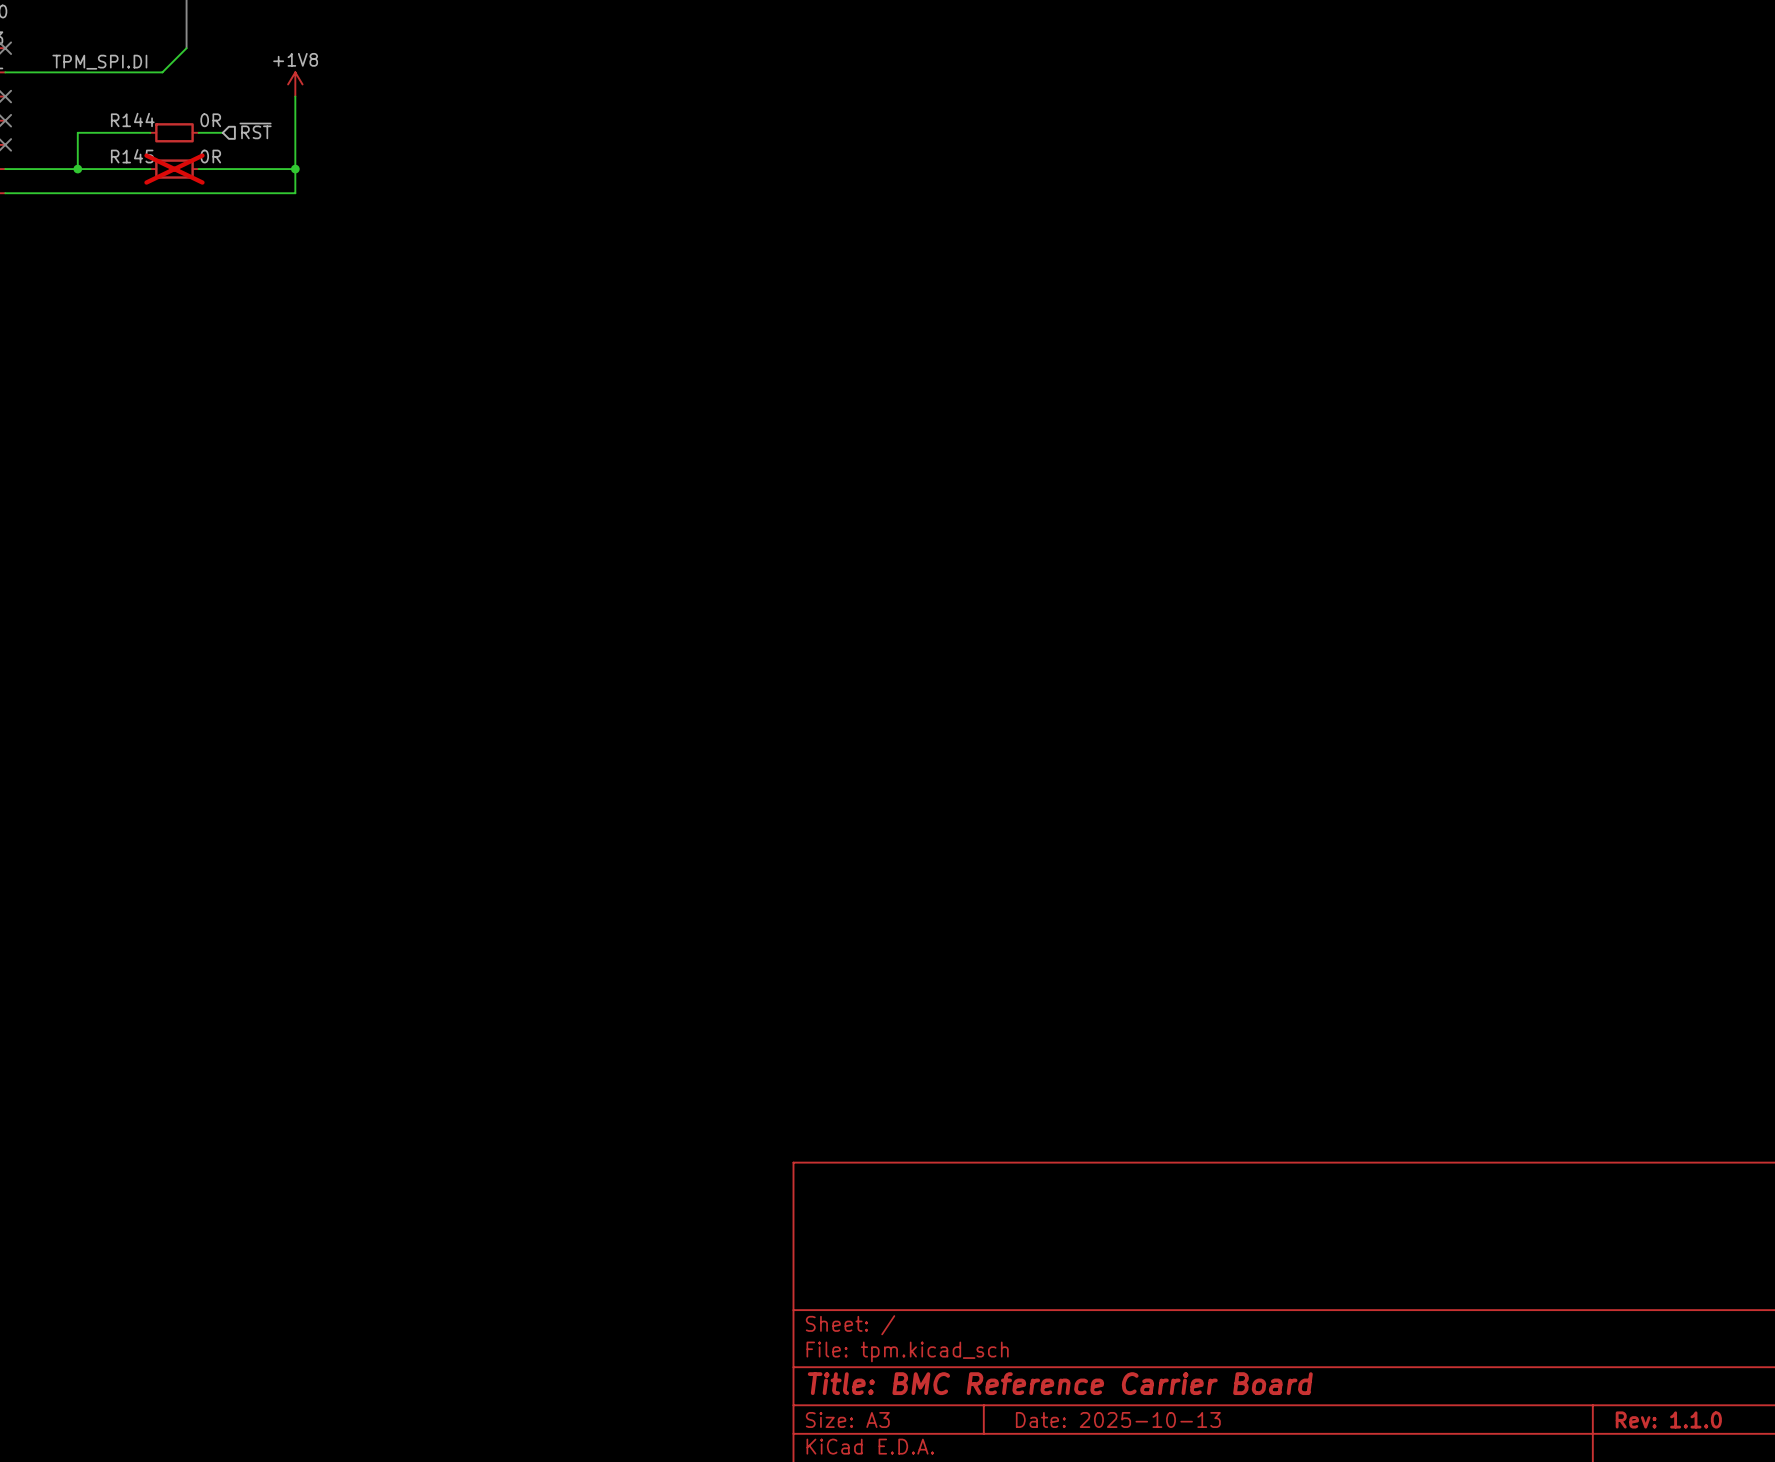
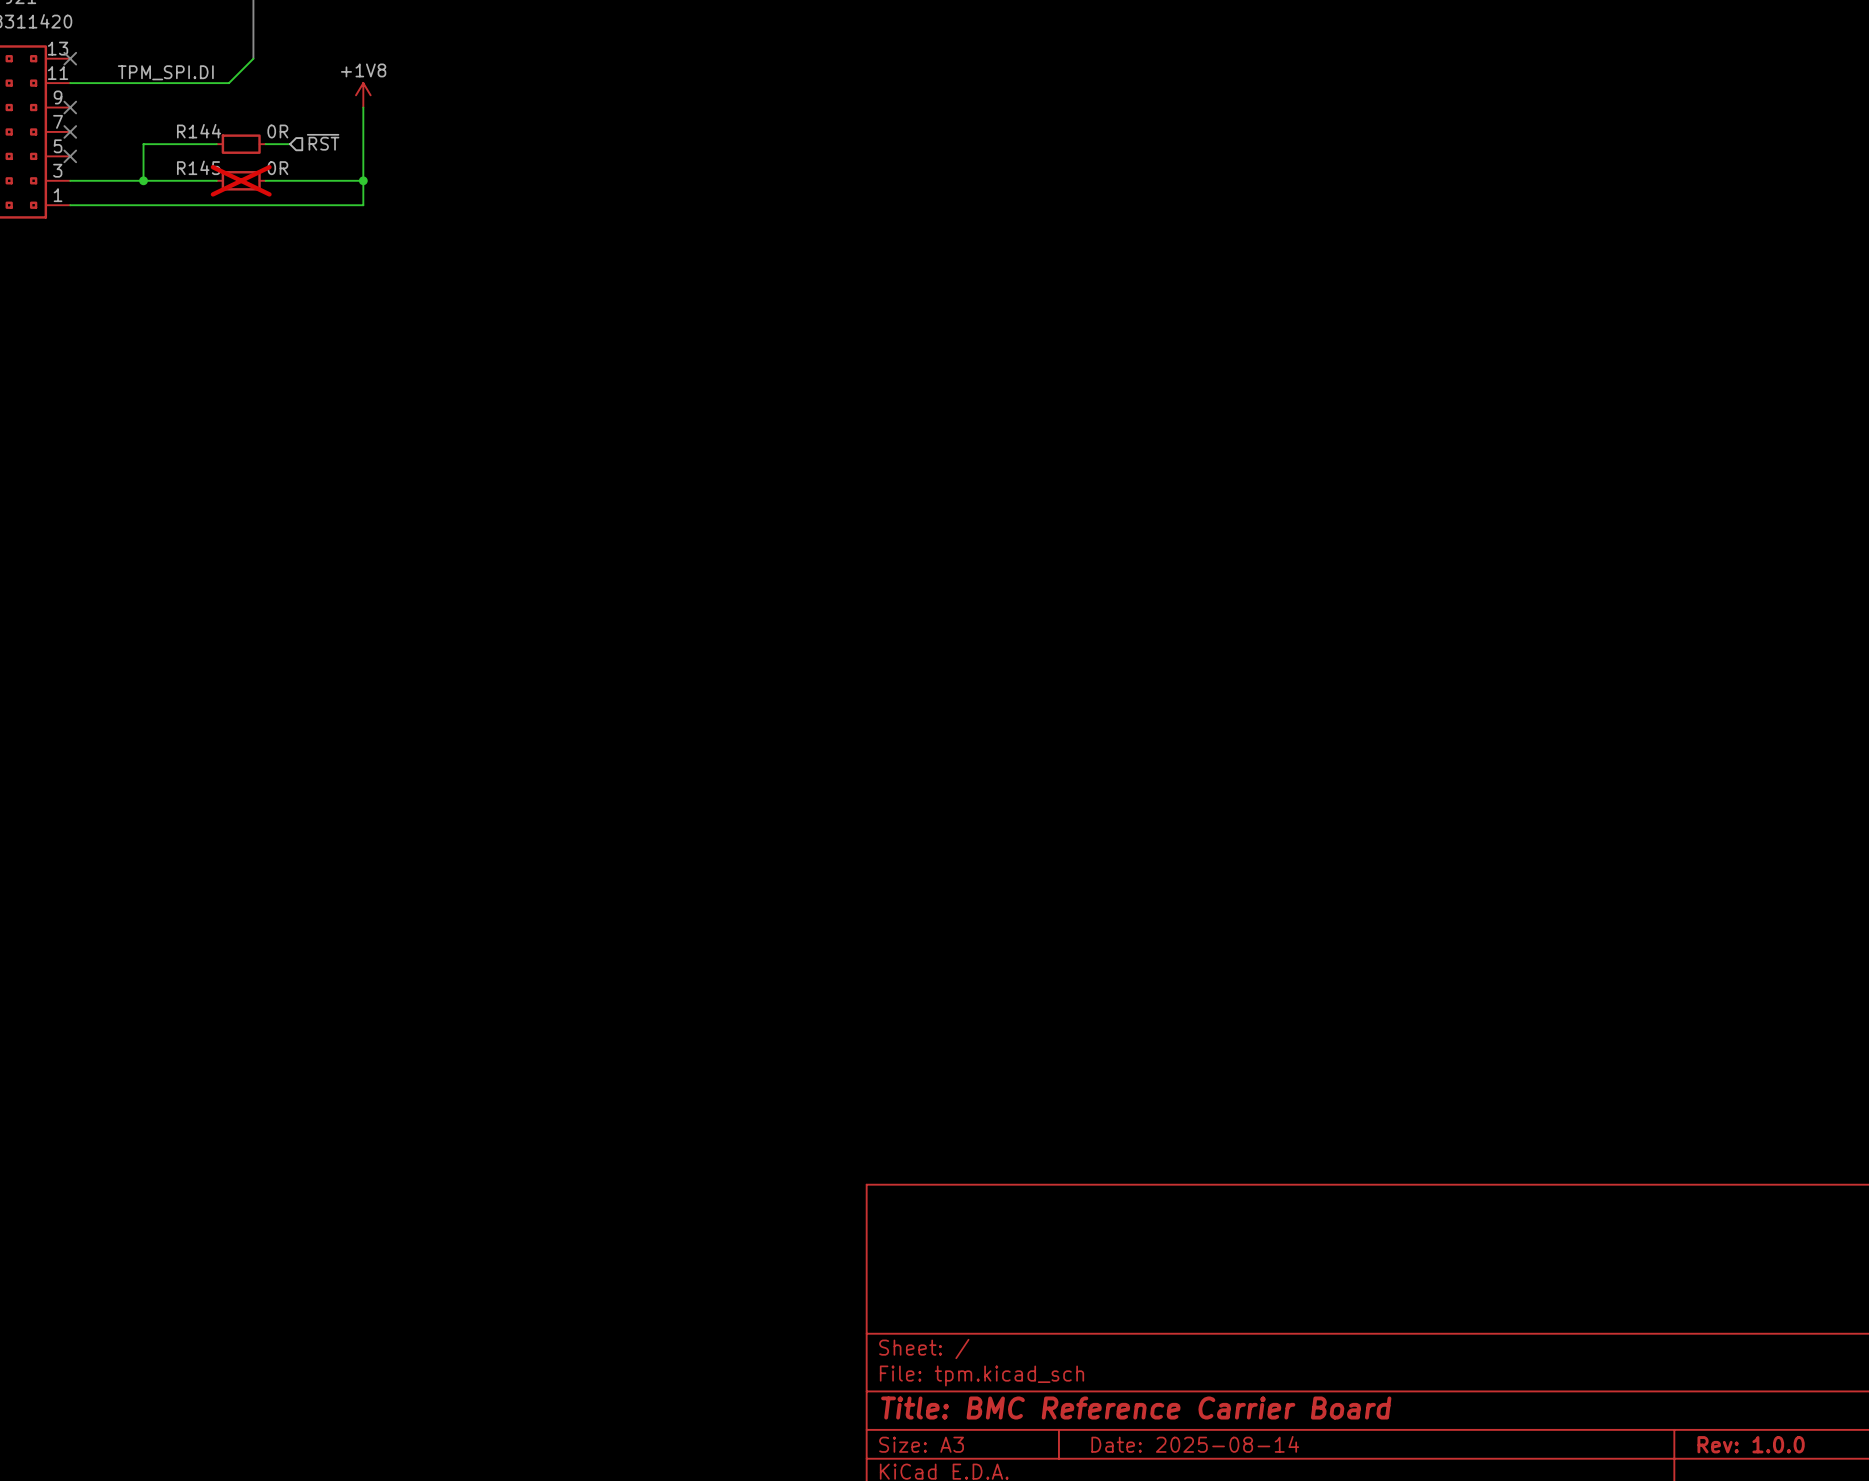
title block: Date: 2025-10-13 (1118, 1419) -> Date: 2025-08-14 (1195, 1444)
title block: Rev: 1.1.0 (1668, 1419) -> Rev: 1.0.0 (1751, 1444)

